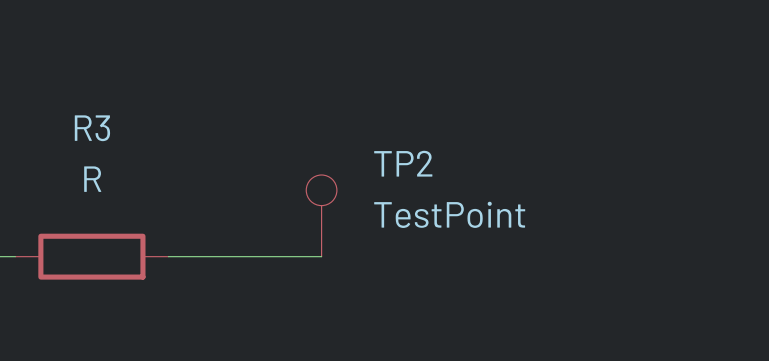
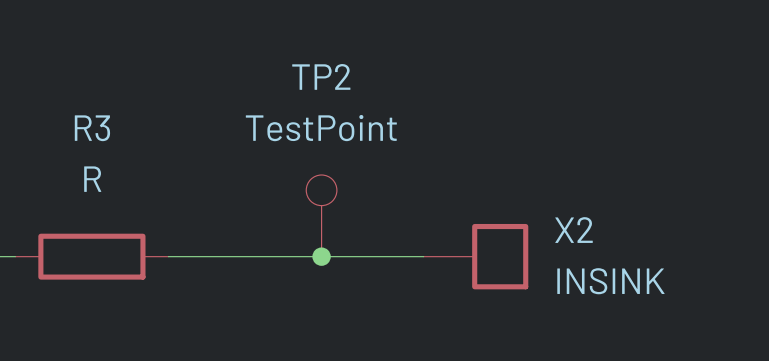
TP2 name position: TP2 (403, 163) -> TP2 (321, 76)
TP2 value position: TestPoint (449, 214) -> TestPoint (321, 128)
wire: none -> (321, 256) (423, 256)
junction: none -> (321, 256)
X2: none -> INSINK (475, 256)

